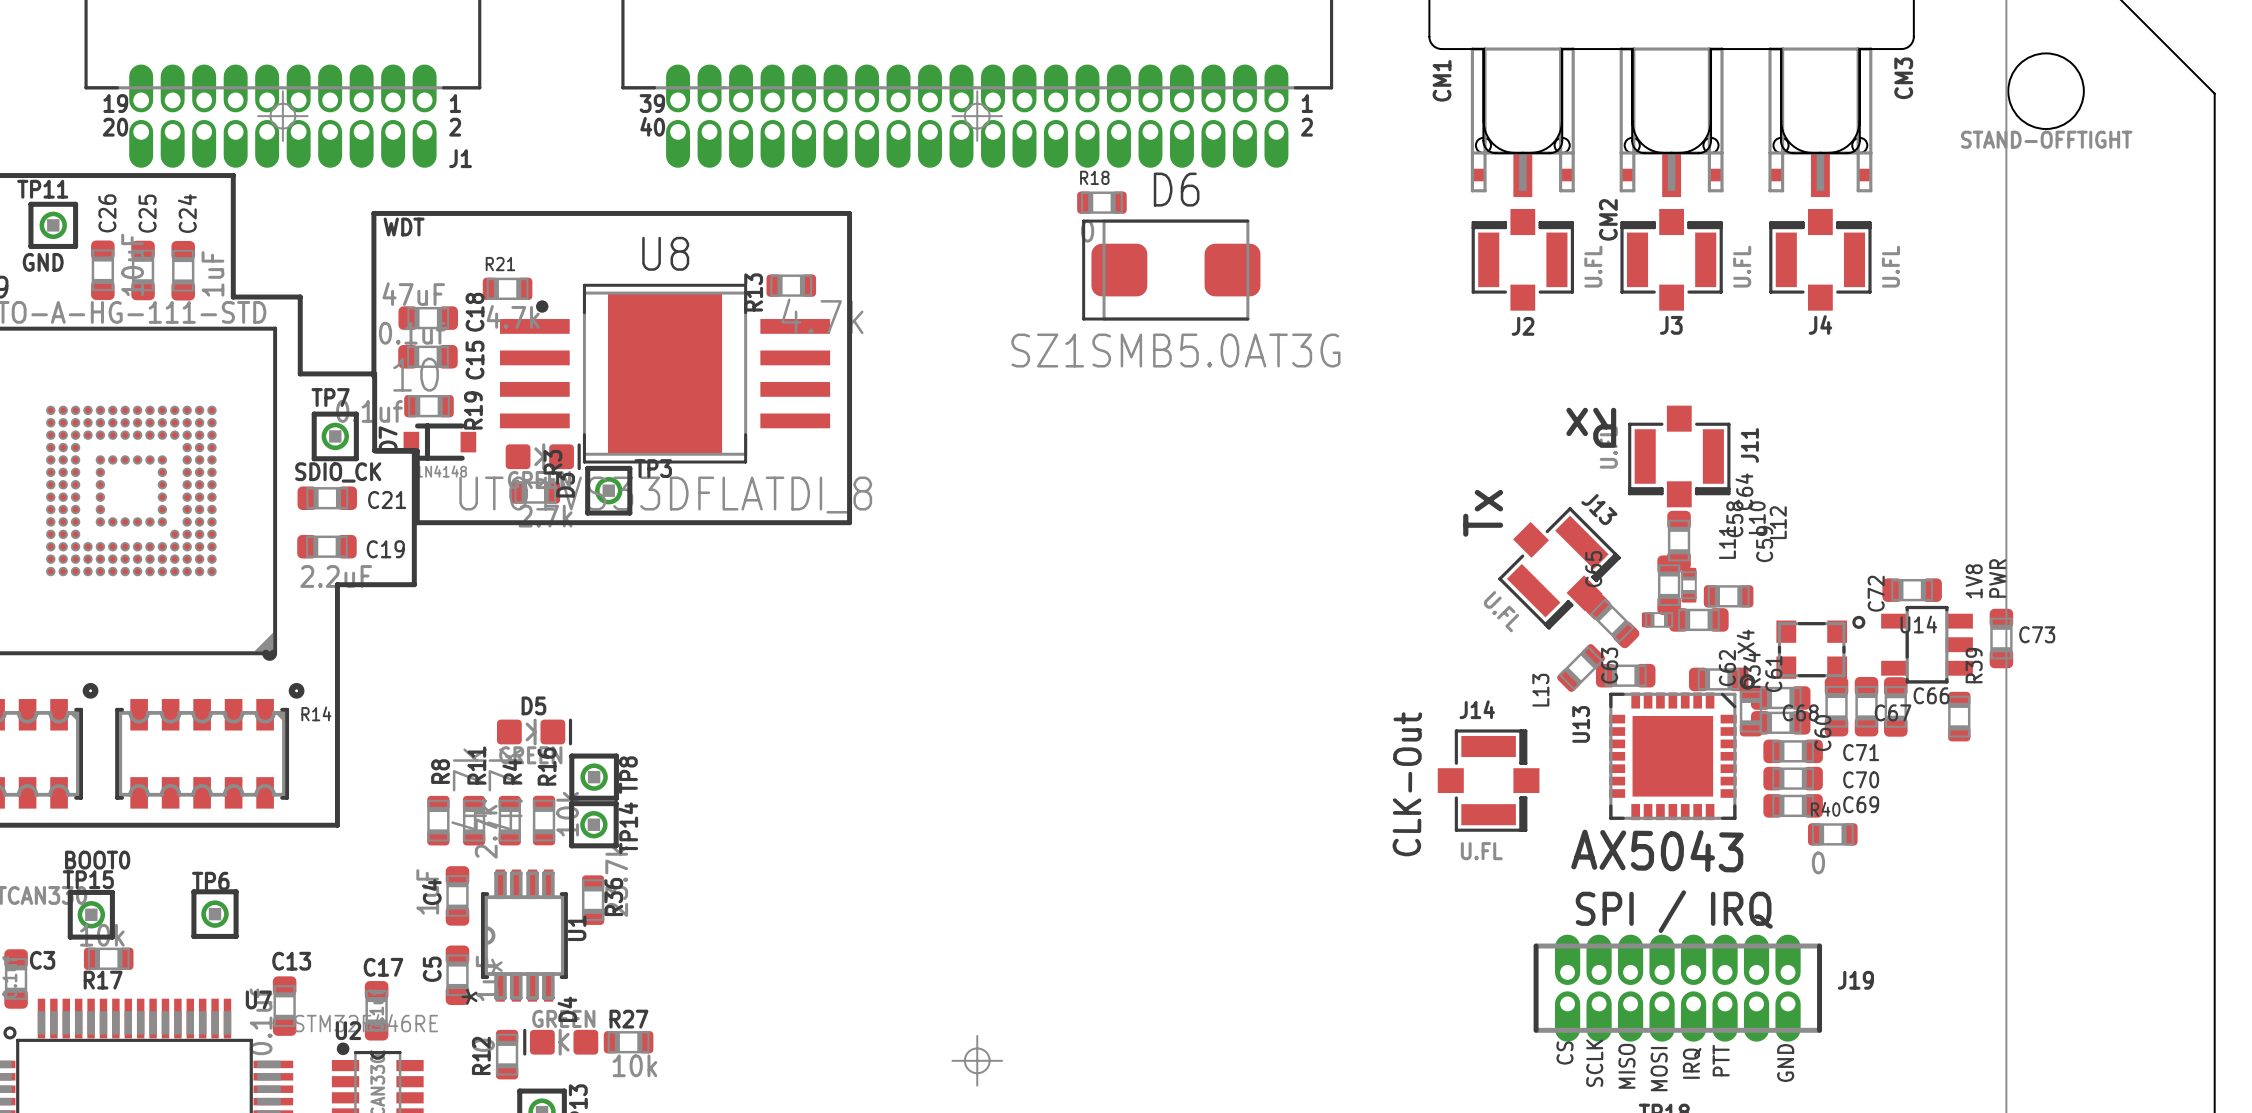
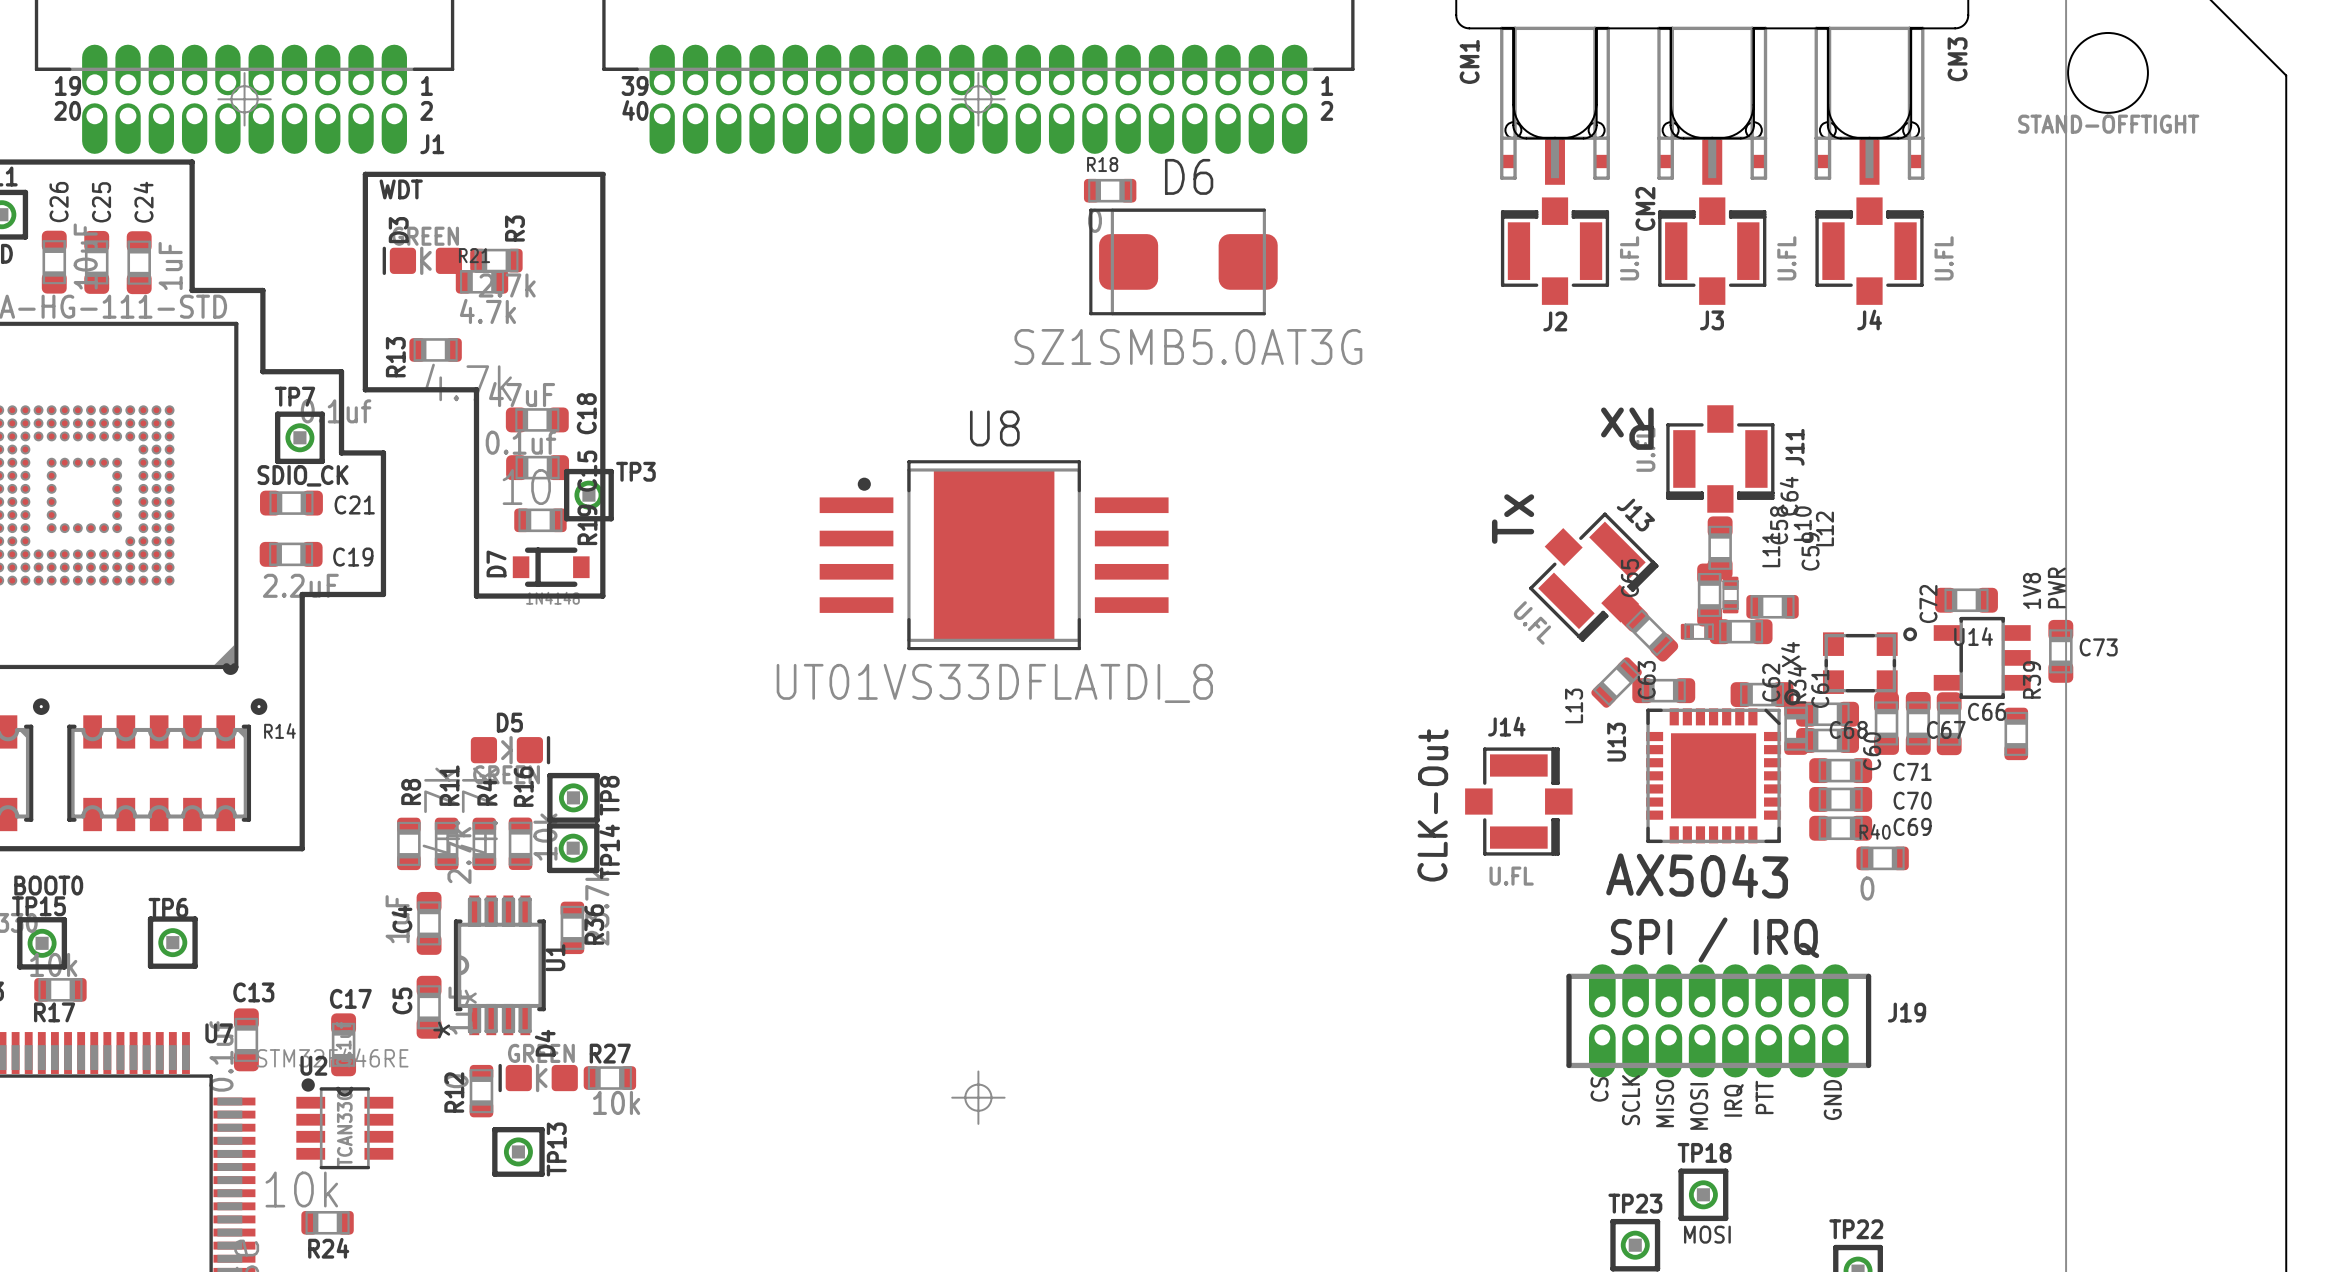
line: none -> (603, 174) (365, 174) (365, 389) (476, 389) (476, 596) (602, 596) (602, 176)
text position: WDT (404, 226) -> WDT (401, 189)
R13 position: (791, 285) -> (435, 349)
C18 position: (428, 318) -> (537, 419)
C15 position: (427, 356) -> (537, 467)
U8 position: (665, 373) -> (994, 555)
line: (373, 376) (373, 213) (849, 213) (849, 522) (417, 522) (417, 451) (376, 451) -> none
R19 position: (428, 406) -> (540, 520)
D7 position: (439, 442) -> (551, 567)
D3 rotation: 0° (543, 456) -> 180° (422, 260)
D3 position: (543, 456) -> (422, 260)
R3 position: (535, 492) -> (496, 260)

